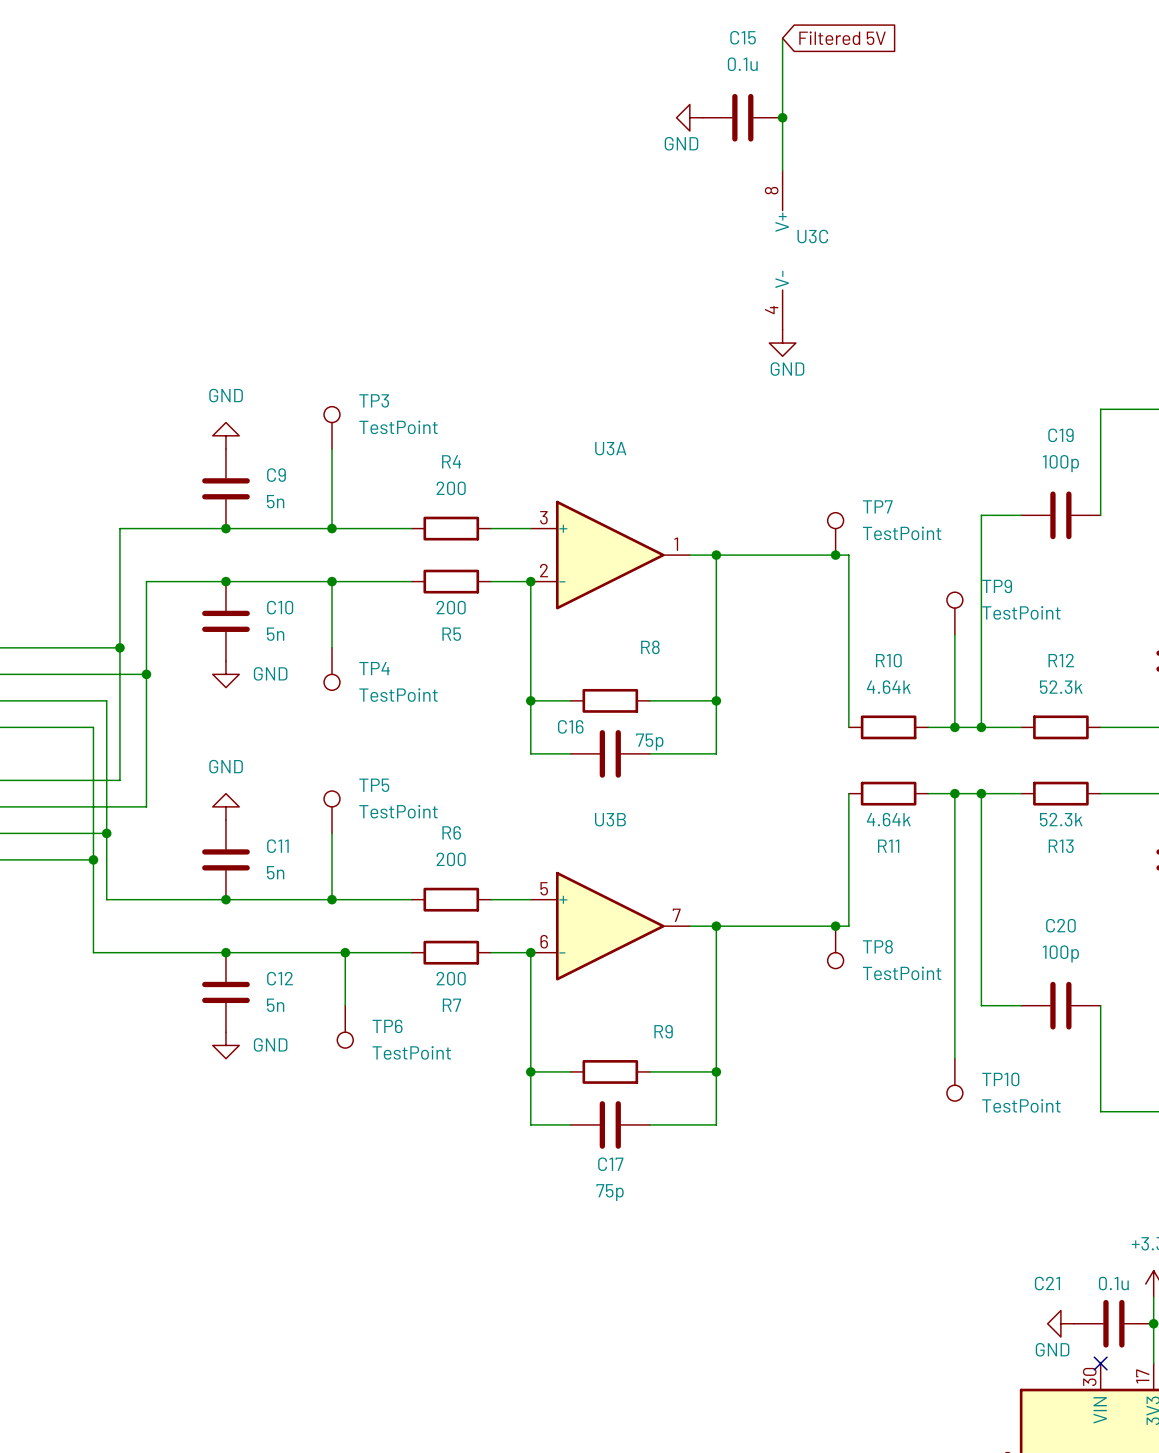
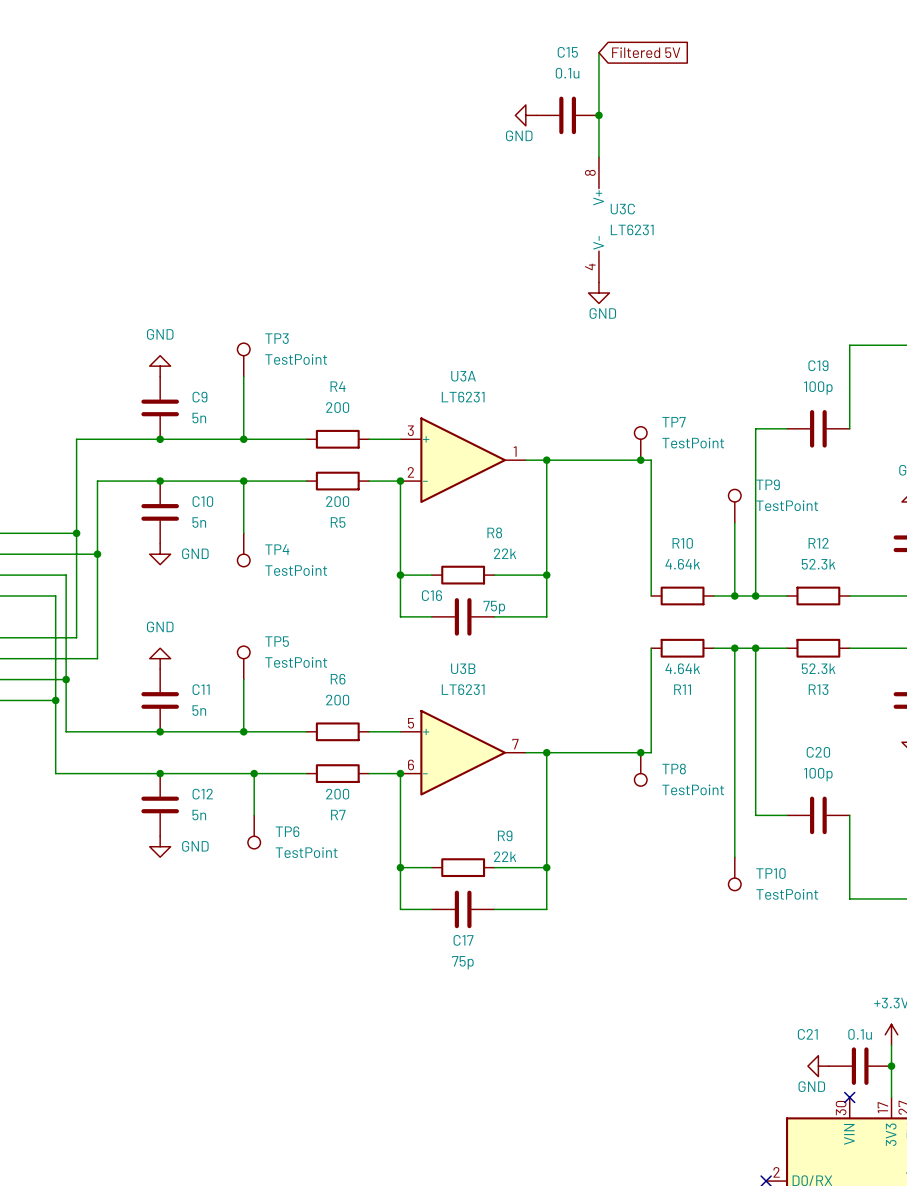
U3C value: none -> LT6231 (632, 229)
U3A value: none -> LT6231 (463, 397)
R8 value: none -> 22k (505, 553)
U3B value: none -> LT6231 (463, 689)
R9 value: none -> 22k (505, 856)

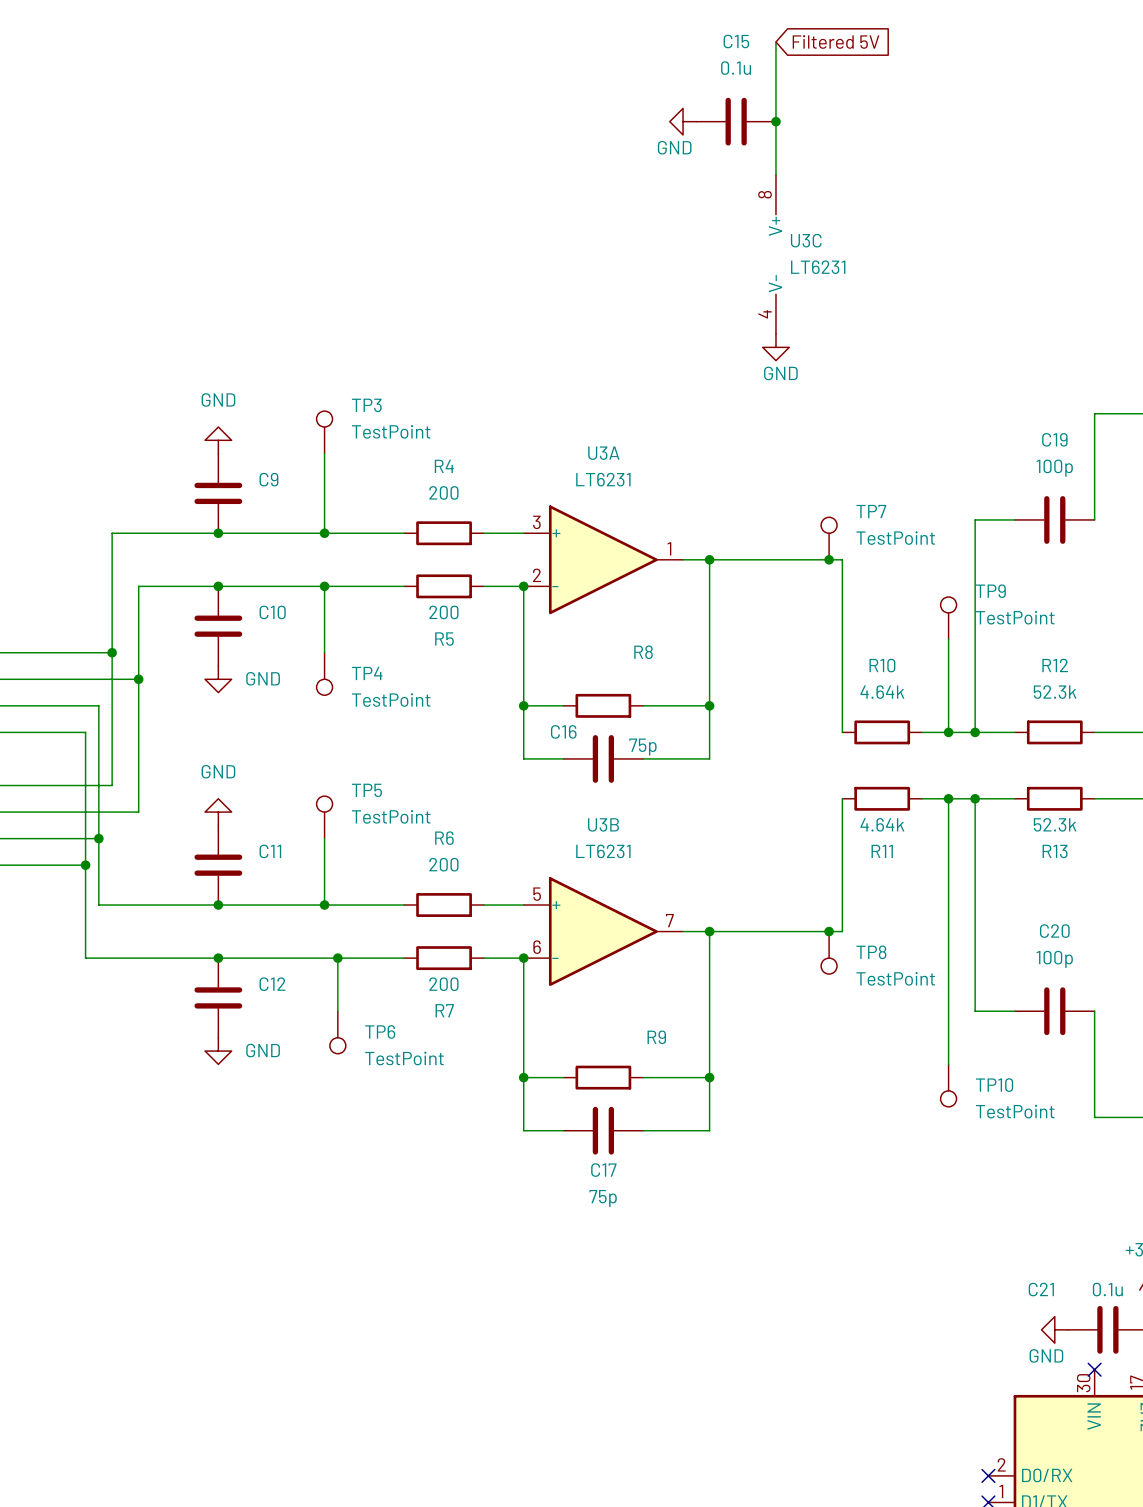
C9 value: 5n (199, 418) -> none
C10 value: 5n (199, 522) -> none
R8 value: 22k (505, 553) -> none
C11 value: 5n (199, 710) -> none
C12 value: 5n (199, 815) -> none
R9 value: 22k (505, 856) -> none

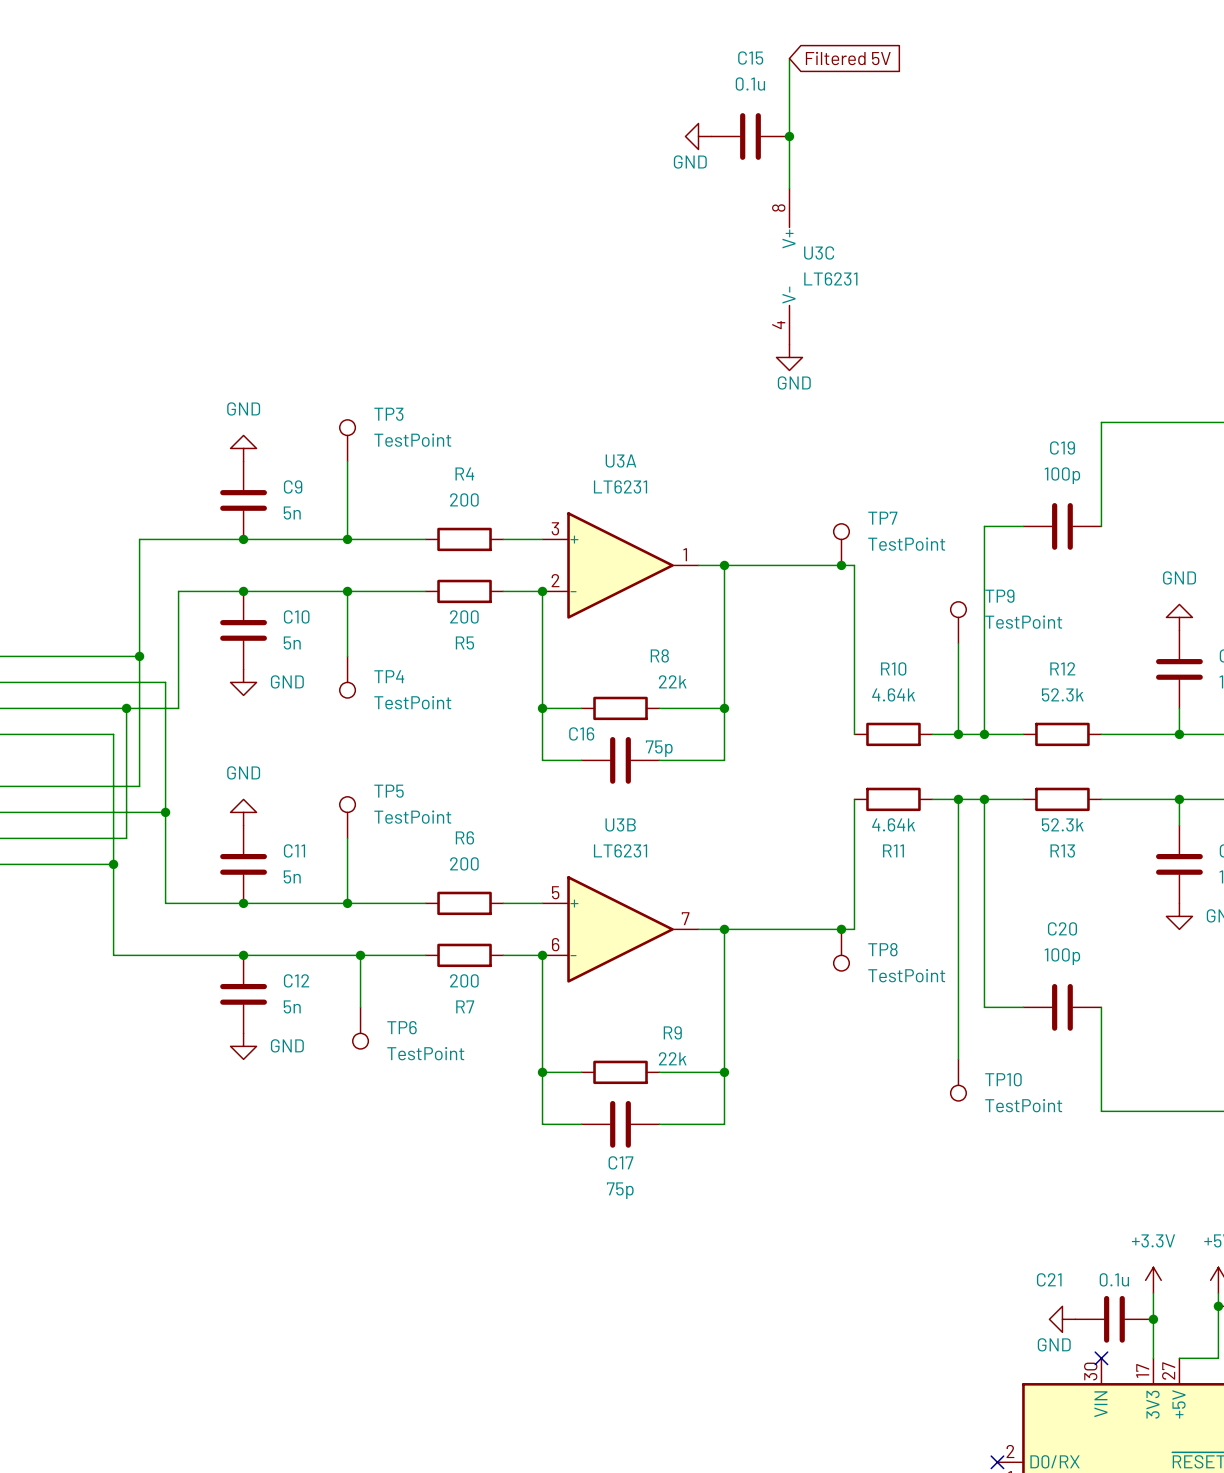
C9 value: none -> 5n (292, 513)
wire: (151, 586) (138, 586) (138, 679) -> (178, 591) (178, 708) (126, 708)
C10 value: none -> 5n (292, 643)
R8 value: none -> 22k (672, 681)
junction position: (138, 679) -> (126, 708)
wire: (98, 838) (98, 905) (138, 905) -> (165, 812) (165, 903)
junction position: (98, 838) -> (165, 812)
C11 value: none -> 5n (292, 876)
C12 value: none -> 5n (292, 1006)
R9 value: none -> 22k (672, 1058)

